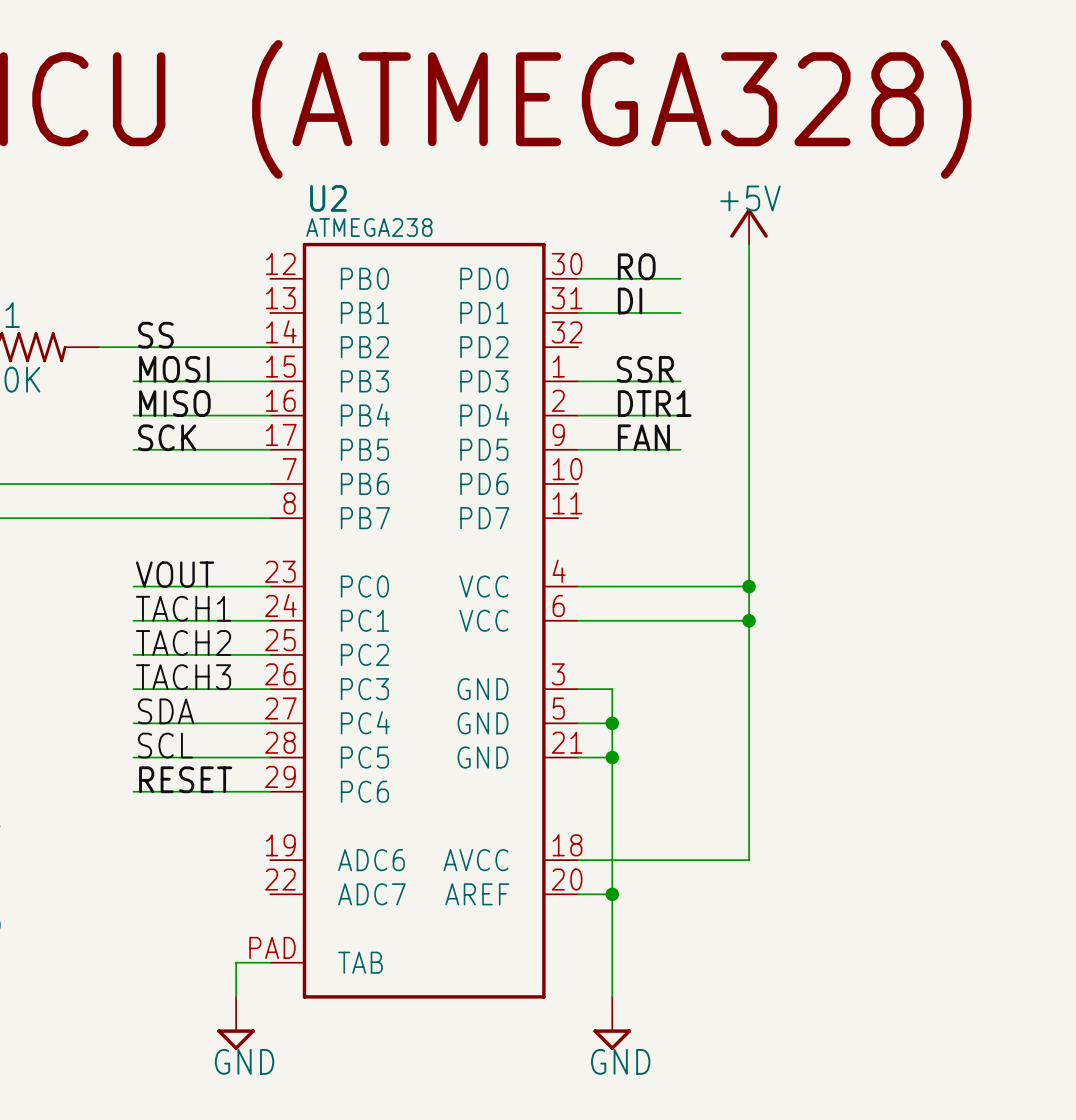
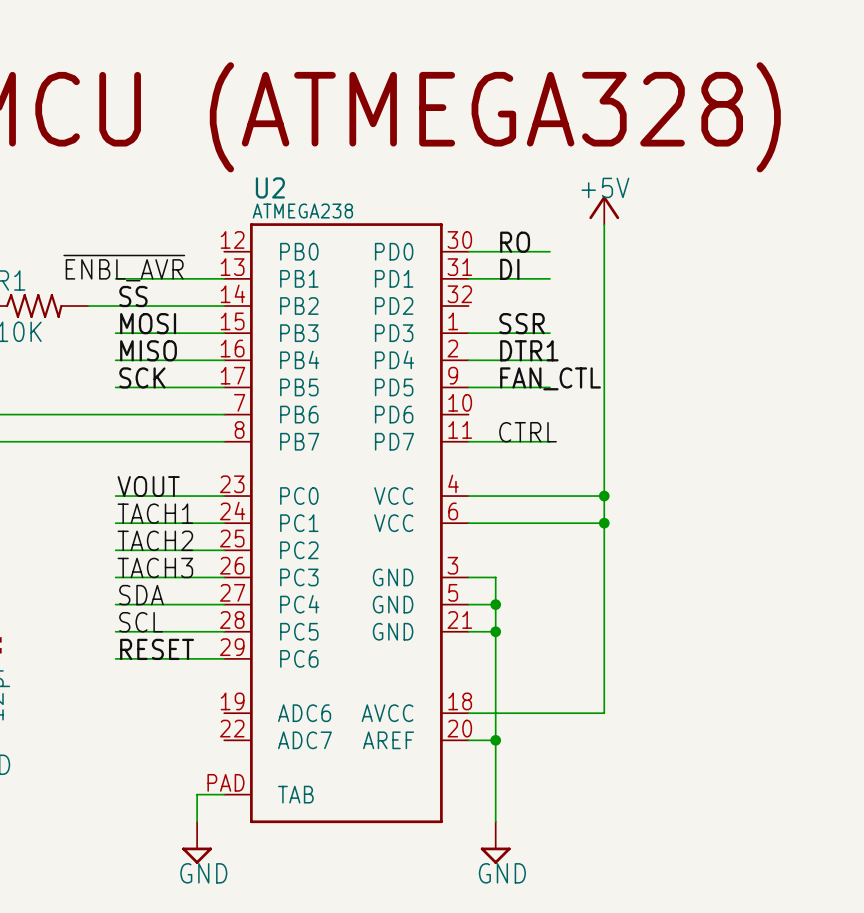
label: none -> ~{ENBL_AVR} (124, 268)
wire: none -> (115, 278) (224, 278)
label: FAN (643, 437) -> FAN_CTL (550, 378)
label: none -> CTRL (528, 432)
wire: none -> (468, 441) (549, 441)

